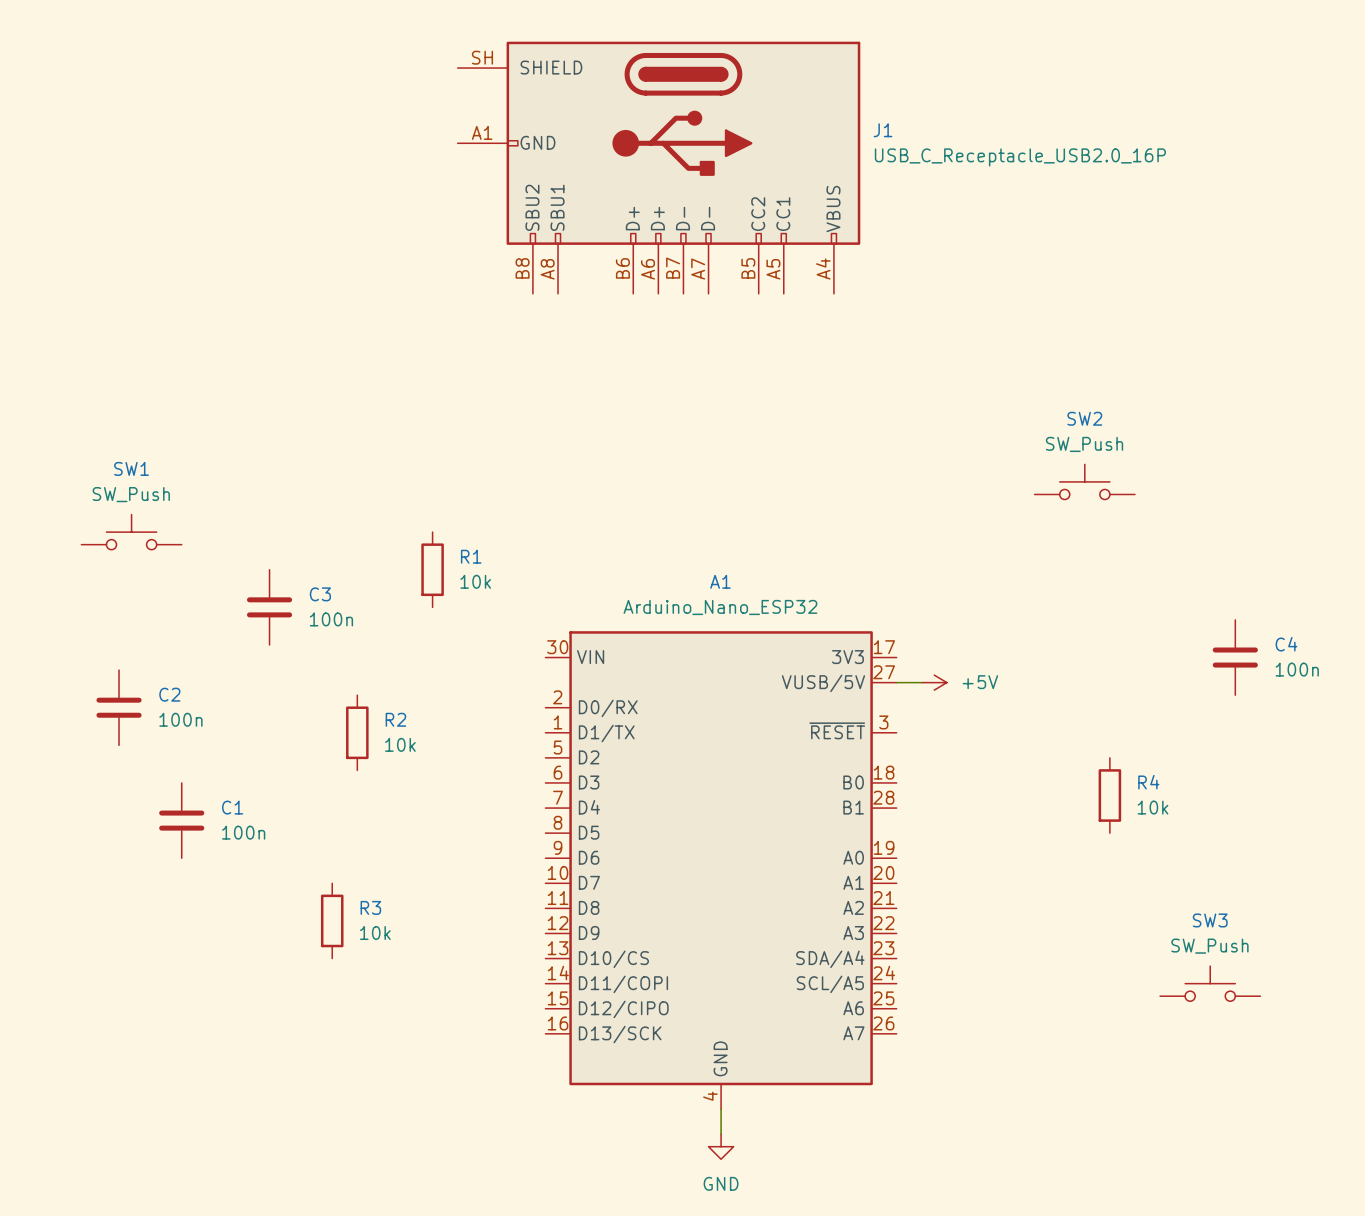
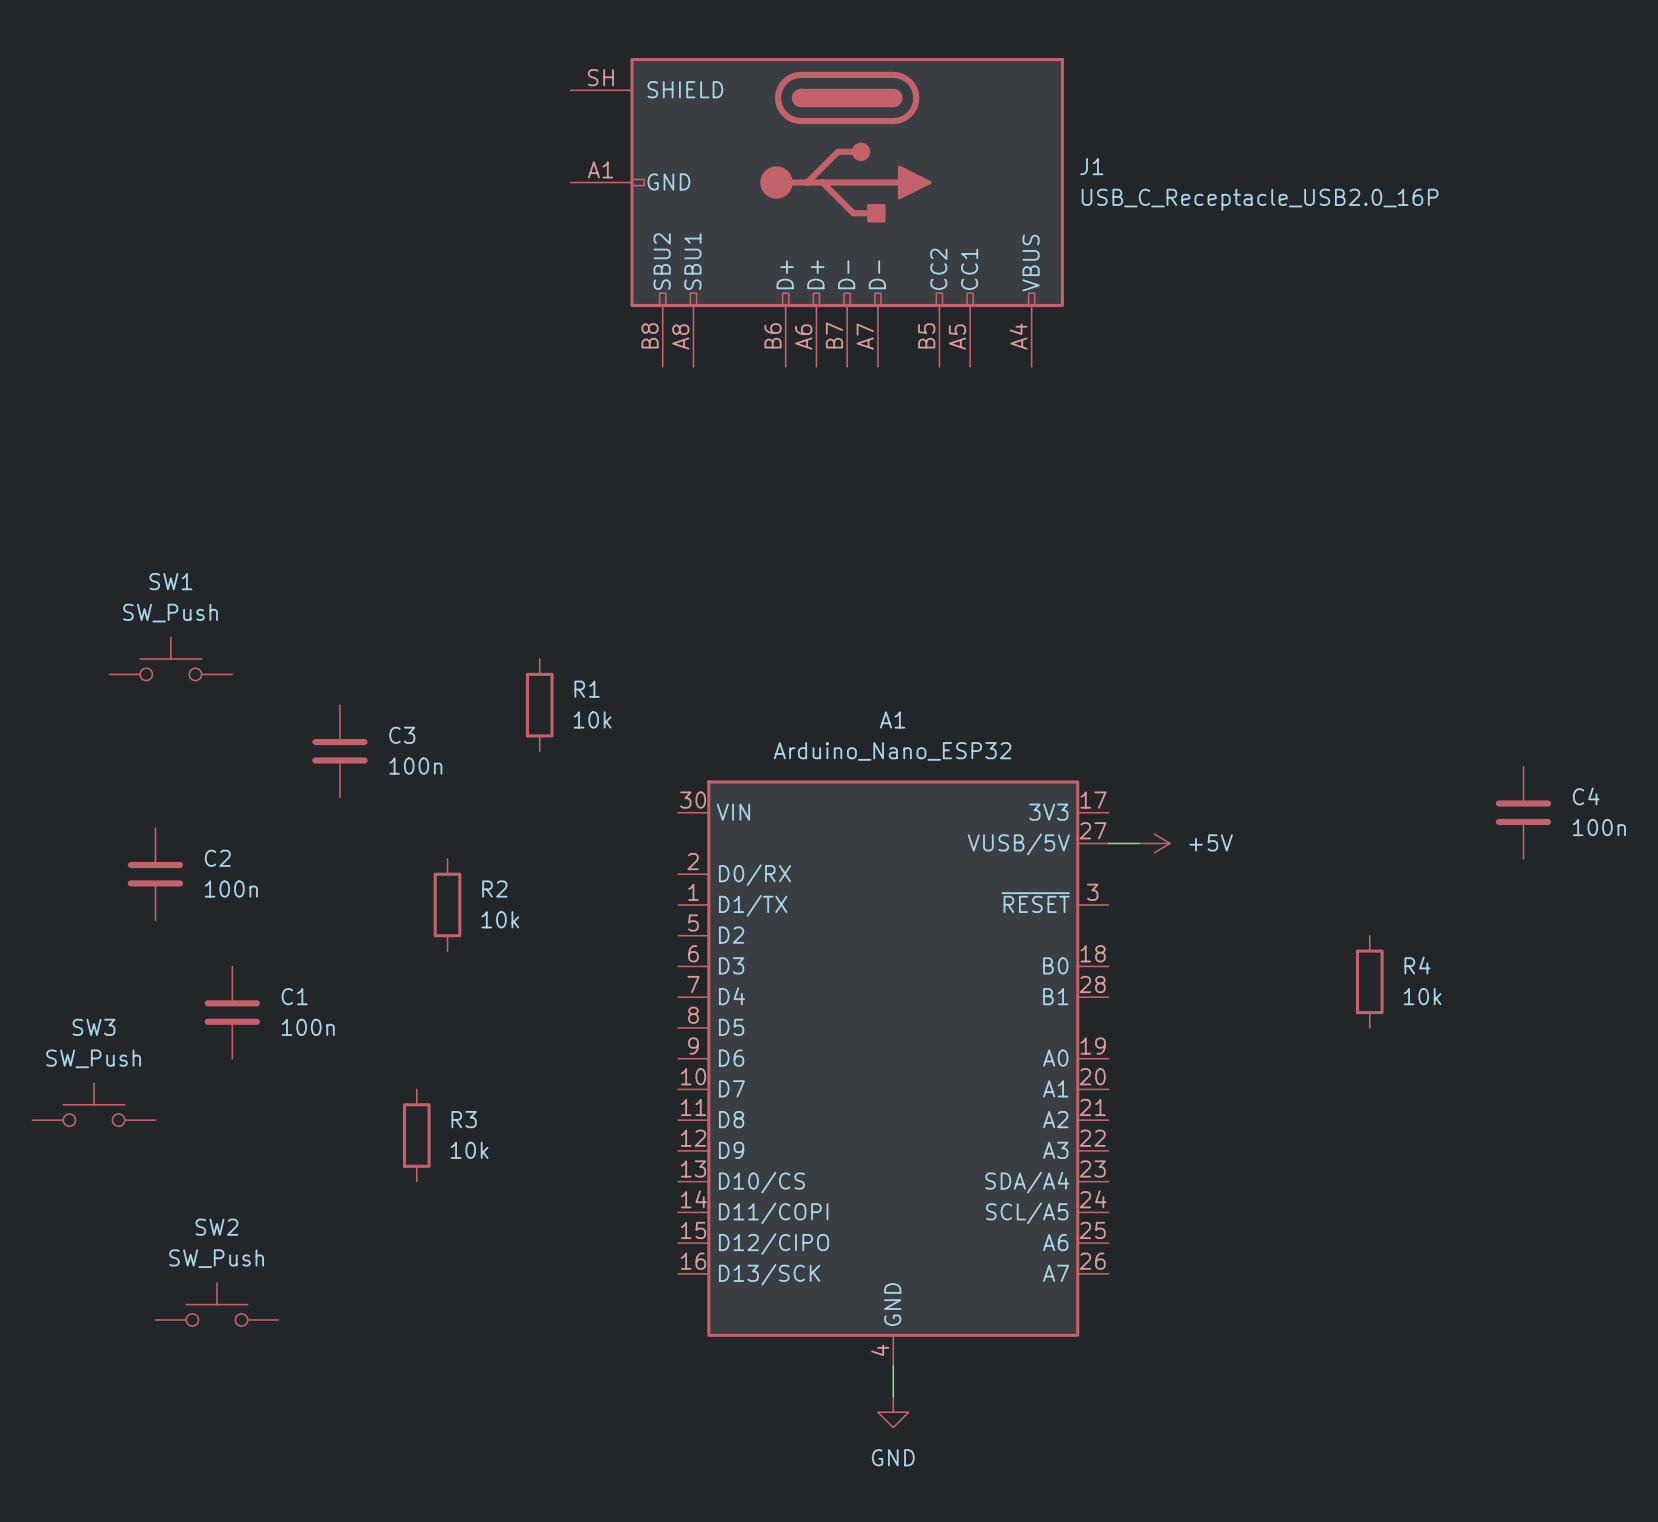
SW2 position: (1084, 481) -> (216, 1304)
SW3 position: (1210, 983) -> (93, 1104)

